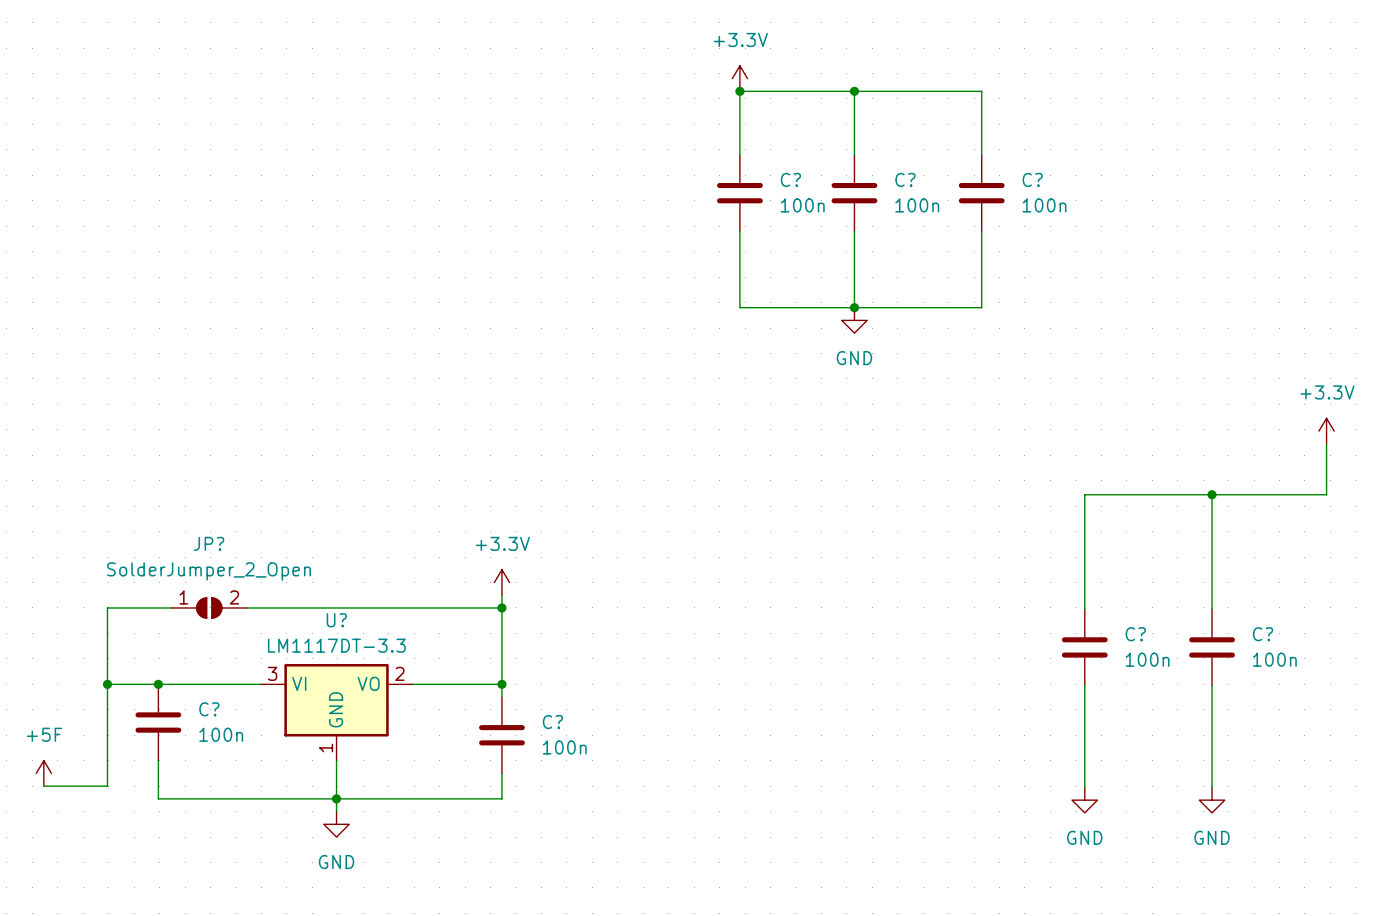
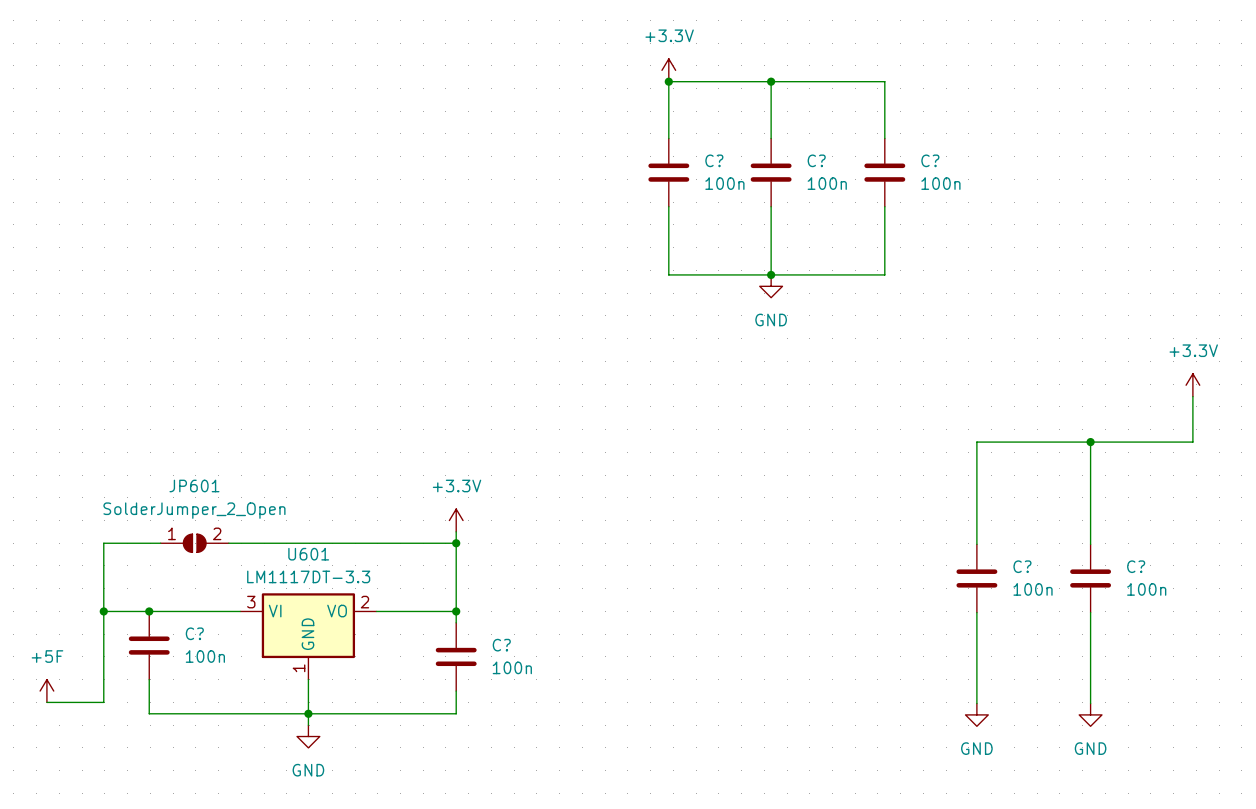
JP? name: JP? (208, 543) -> JP601 (194, 485)
U? name: U? (336, 620) -> U601 (308, 554)

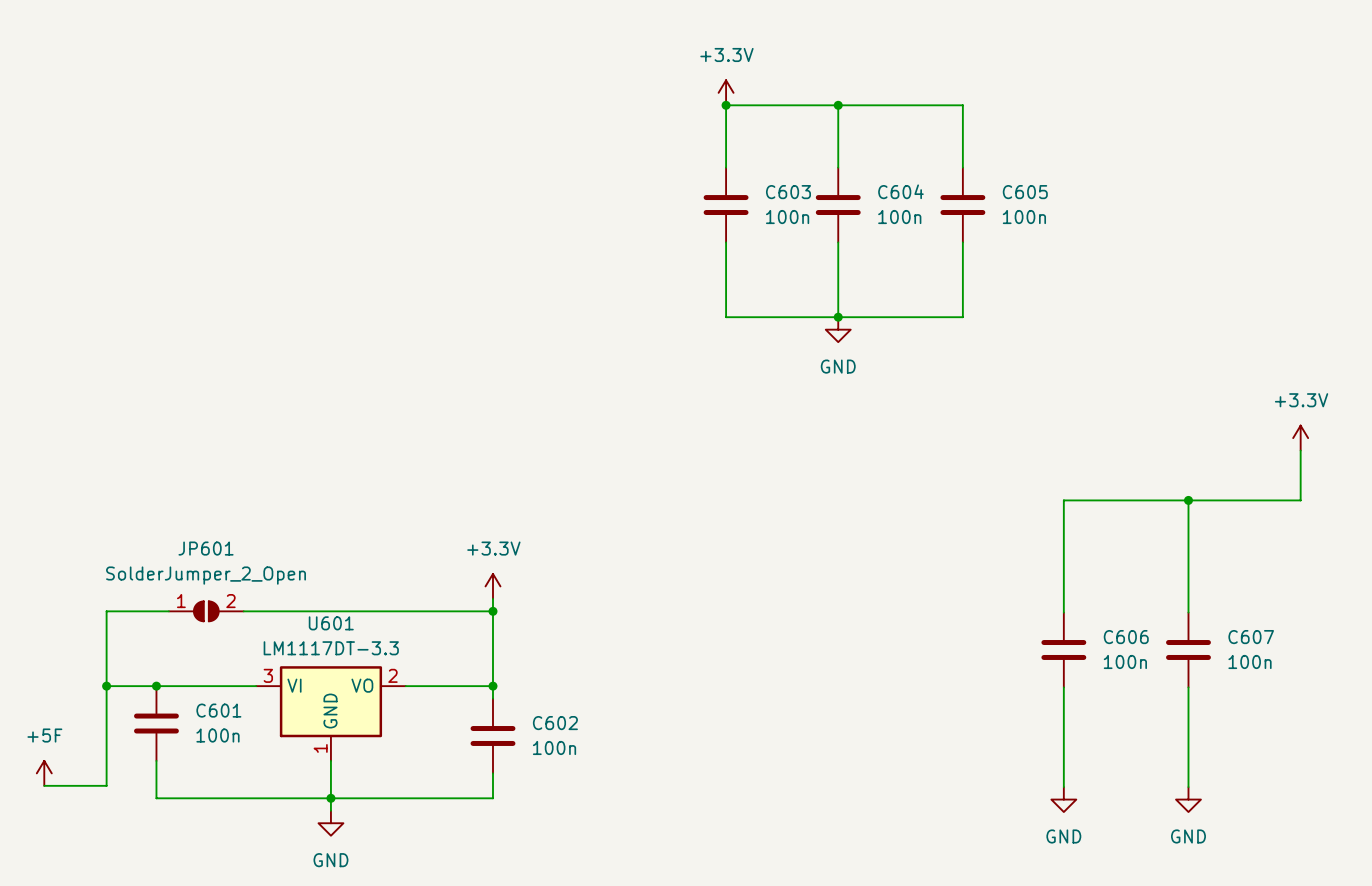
C? name: C? (714, 160) -> C603 (788, 192)
C? name: C? (816, 160) -> C604 (900, 191)
C? name: C? (930, 160) -> C605 (1025, 192)
C? name: C? (1022, 566) -> C606 (1126, 637)
C? name: C? (1136, 566) -> C607 (1251, 637)
C? name: C? (194, 633) -> C601 (218, 710)
C? name: C? (501, 645) -> C602 (555, 723)

